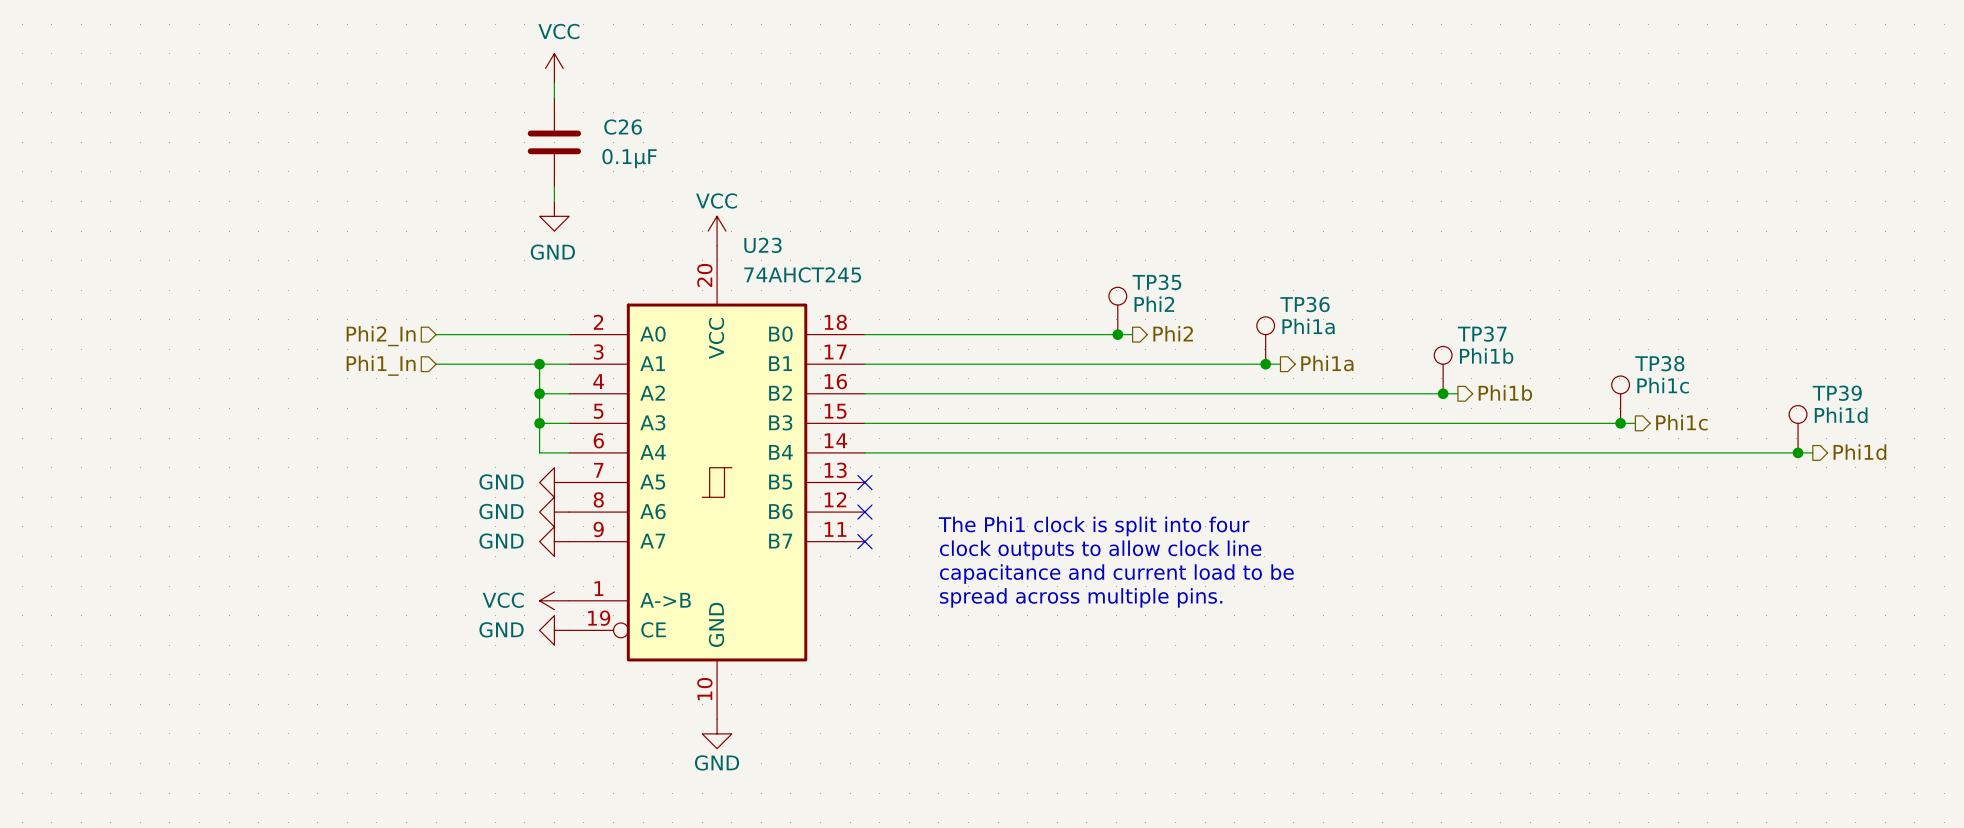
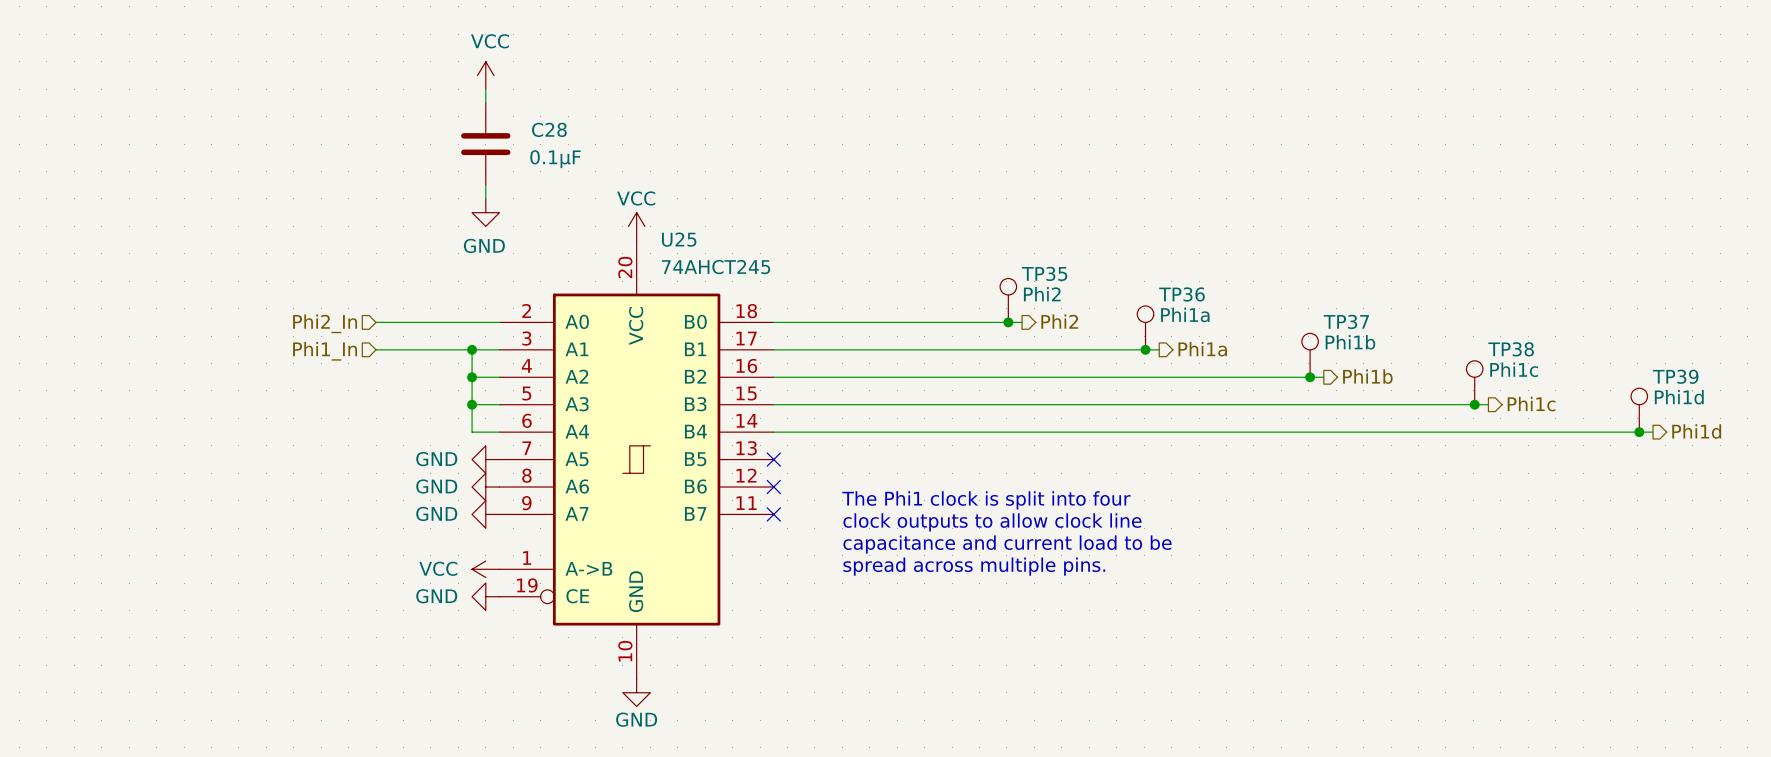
C26 name: C26 (623, 127) -> C28 (549, 129)
U23 name: U23 (762, 245) -> U25 (679, 239)

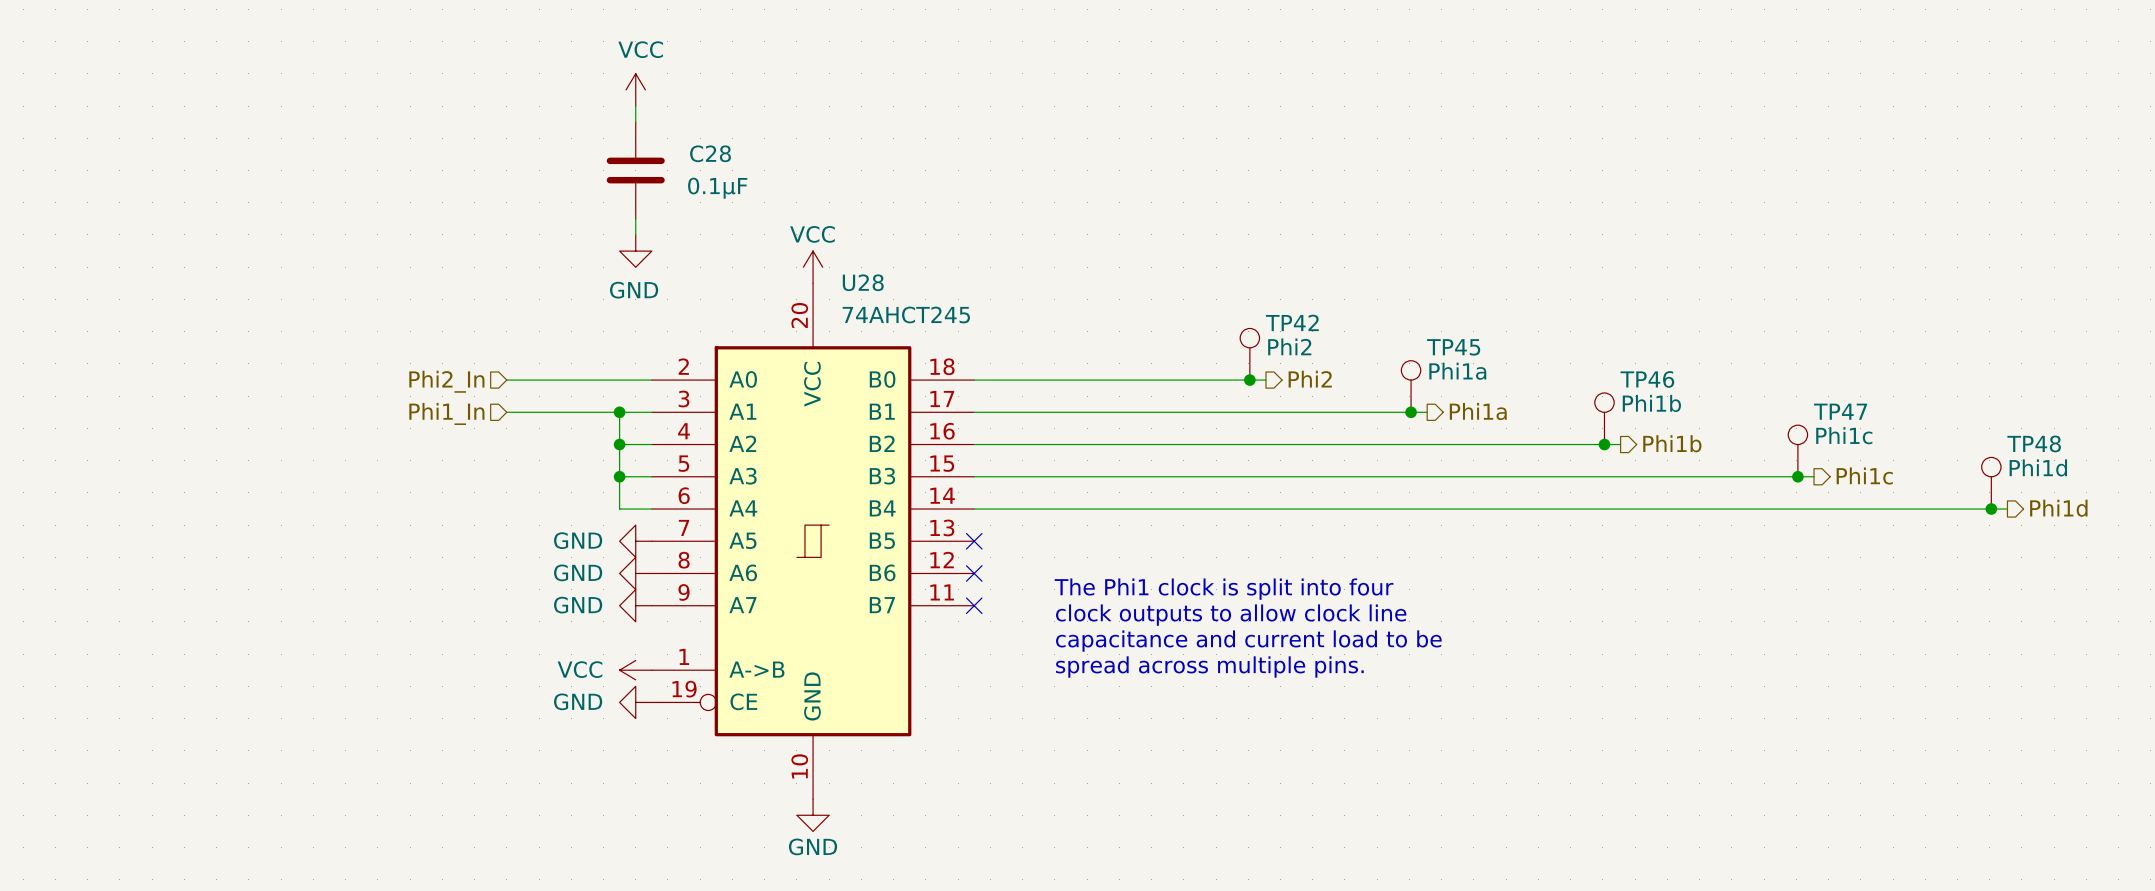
U25 name: U25 (679, 239) -> U28 (863, 282)
TP35 name: TP35 (1044, 273) -> TP42 (1292, 322)
TP36 name: TP36 (1182, 294) -> TP45 (1453, 347)
TP37 name: TP37 (1346, 321) -> TP46 (1647, 379)
TP38 name: TP38 (1511, 349) -> TP47 (1840, 411)
TP39 name: TP39 (1675, 376) -> TP48 (2034, 443)

